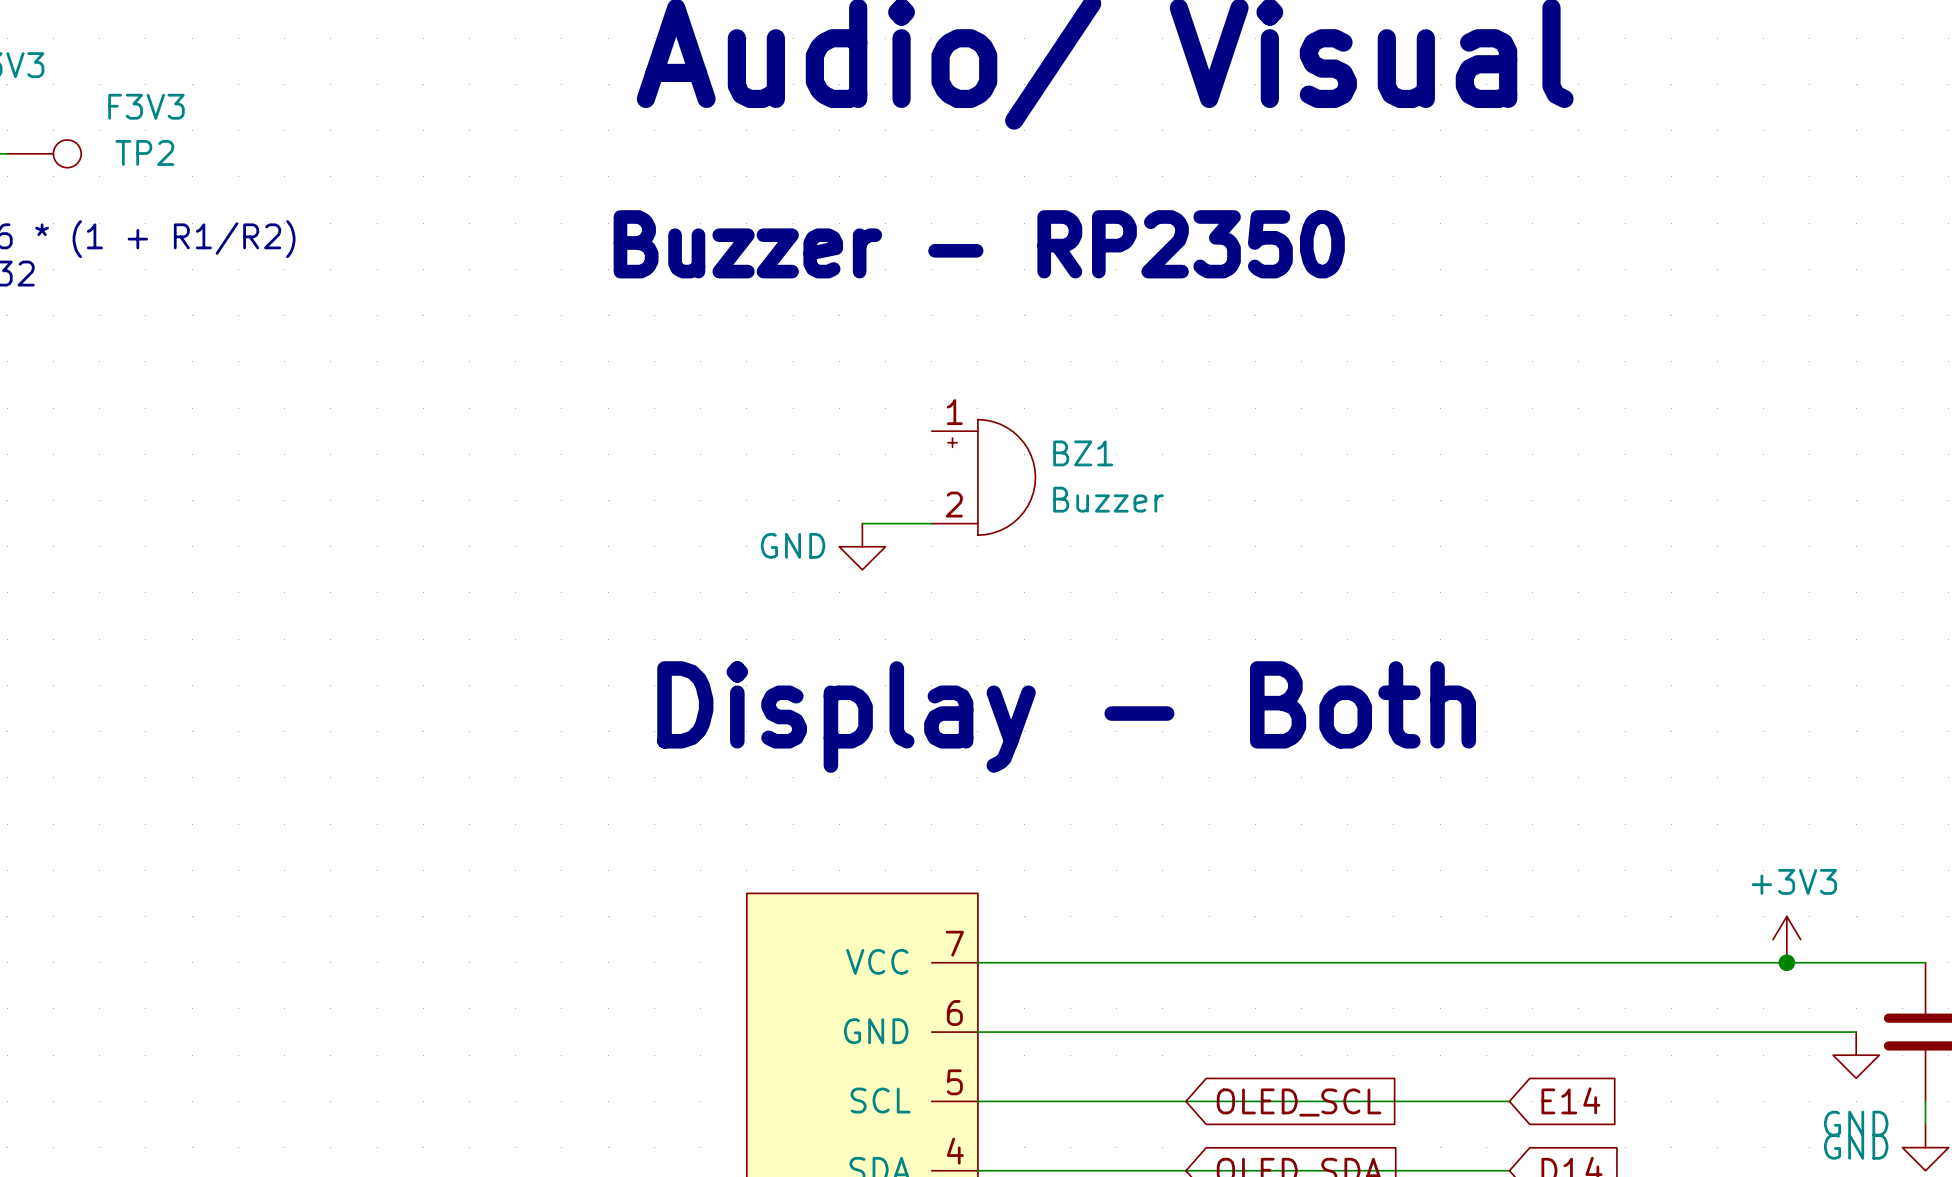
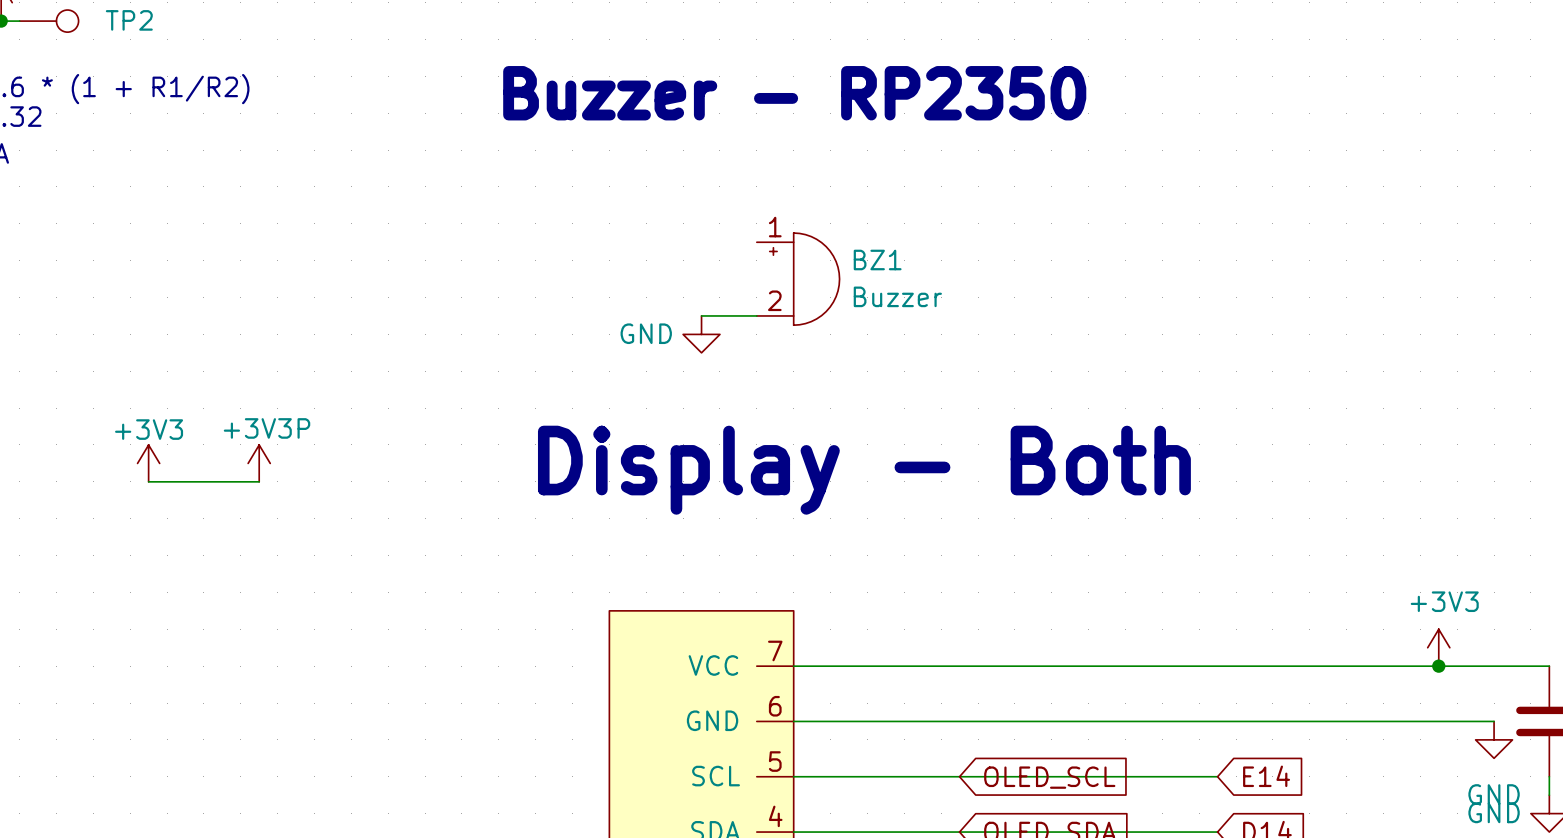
power symbol: none -> +3V3 (148, 463)
power symbol: none -> +3V3P (259, 463)
wire: none -> (148, 481) (259, 481)

